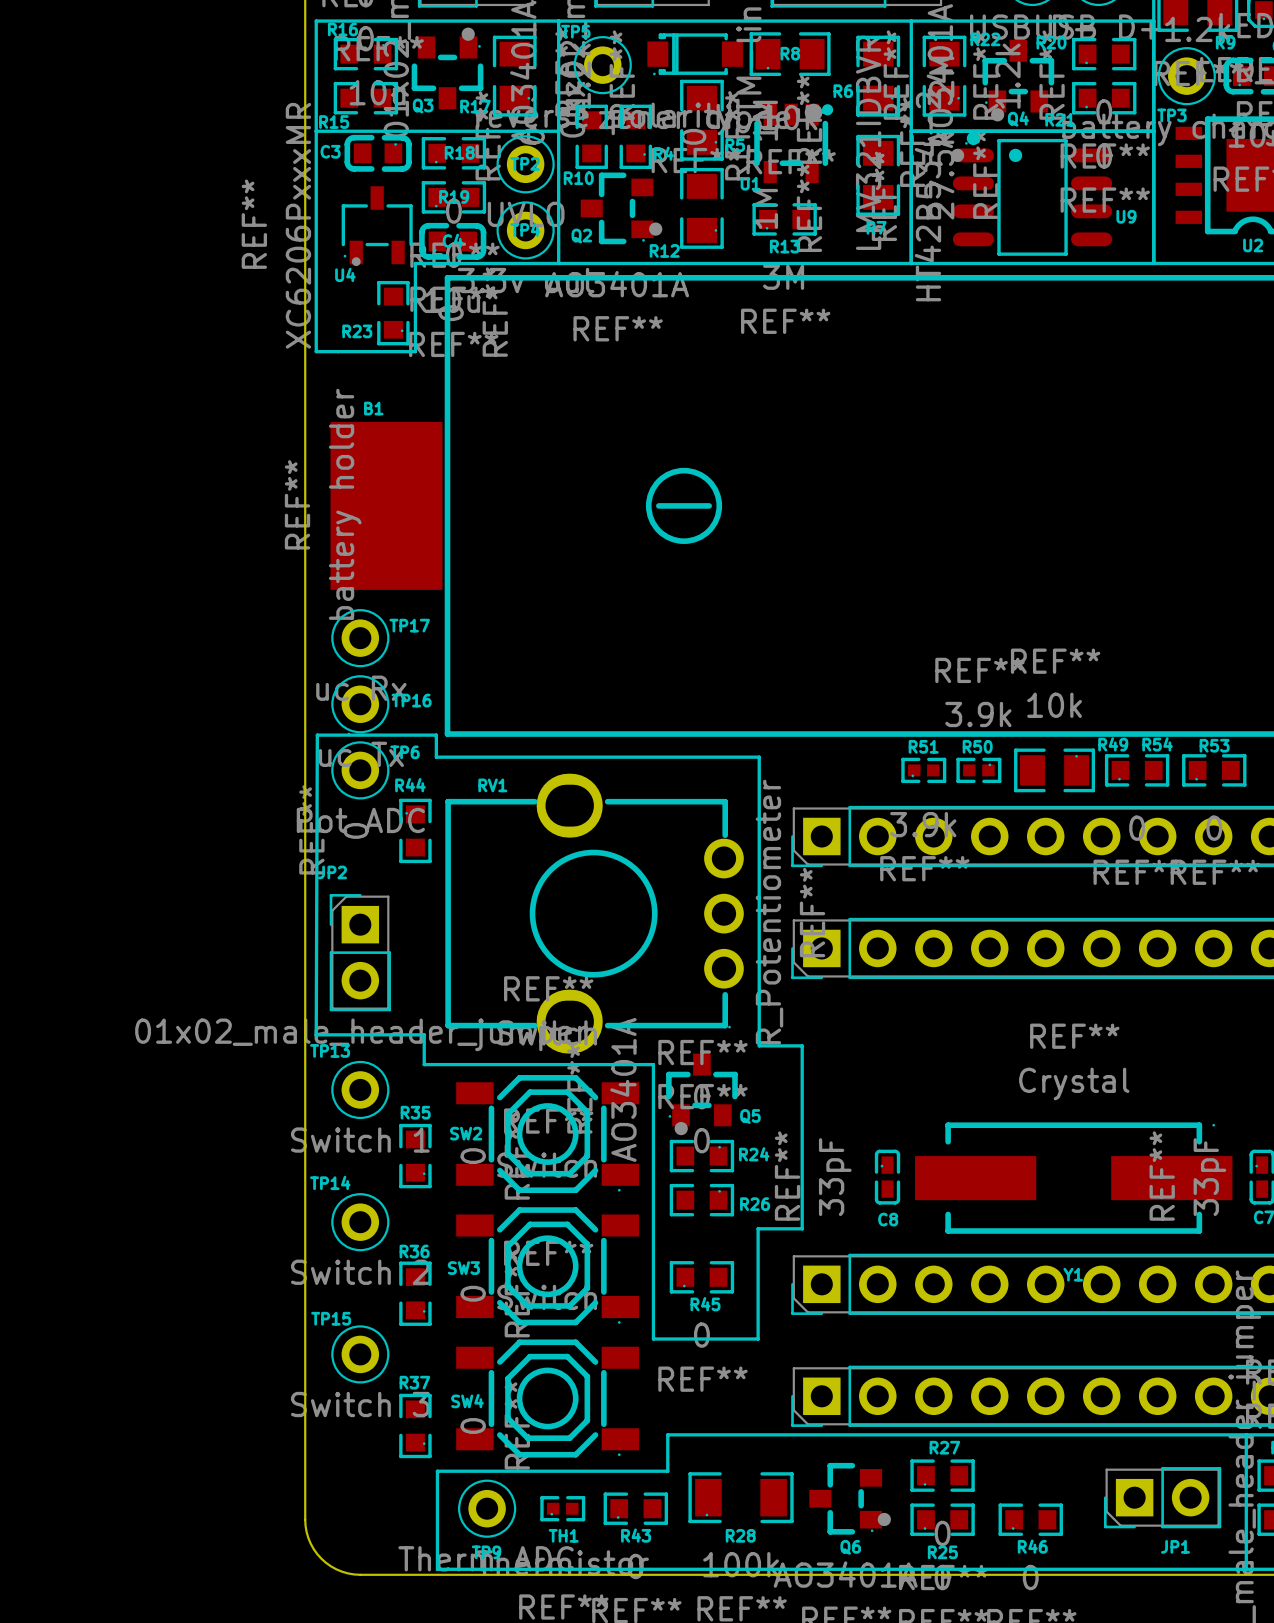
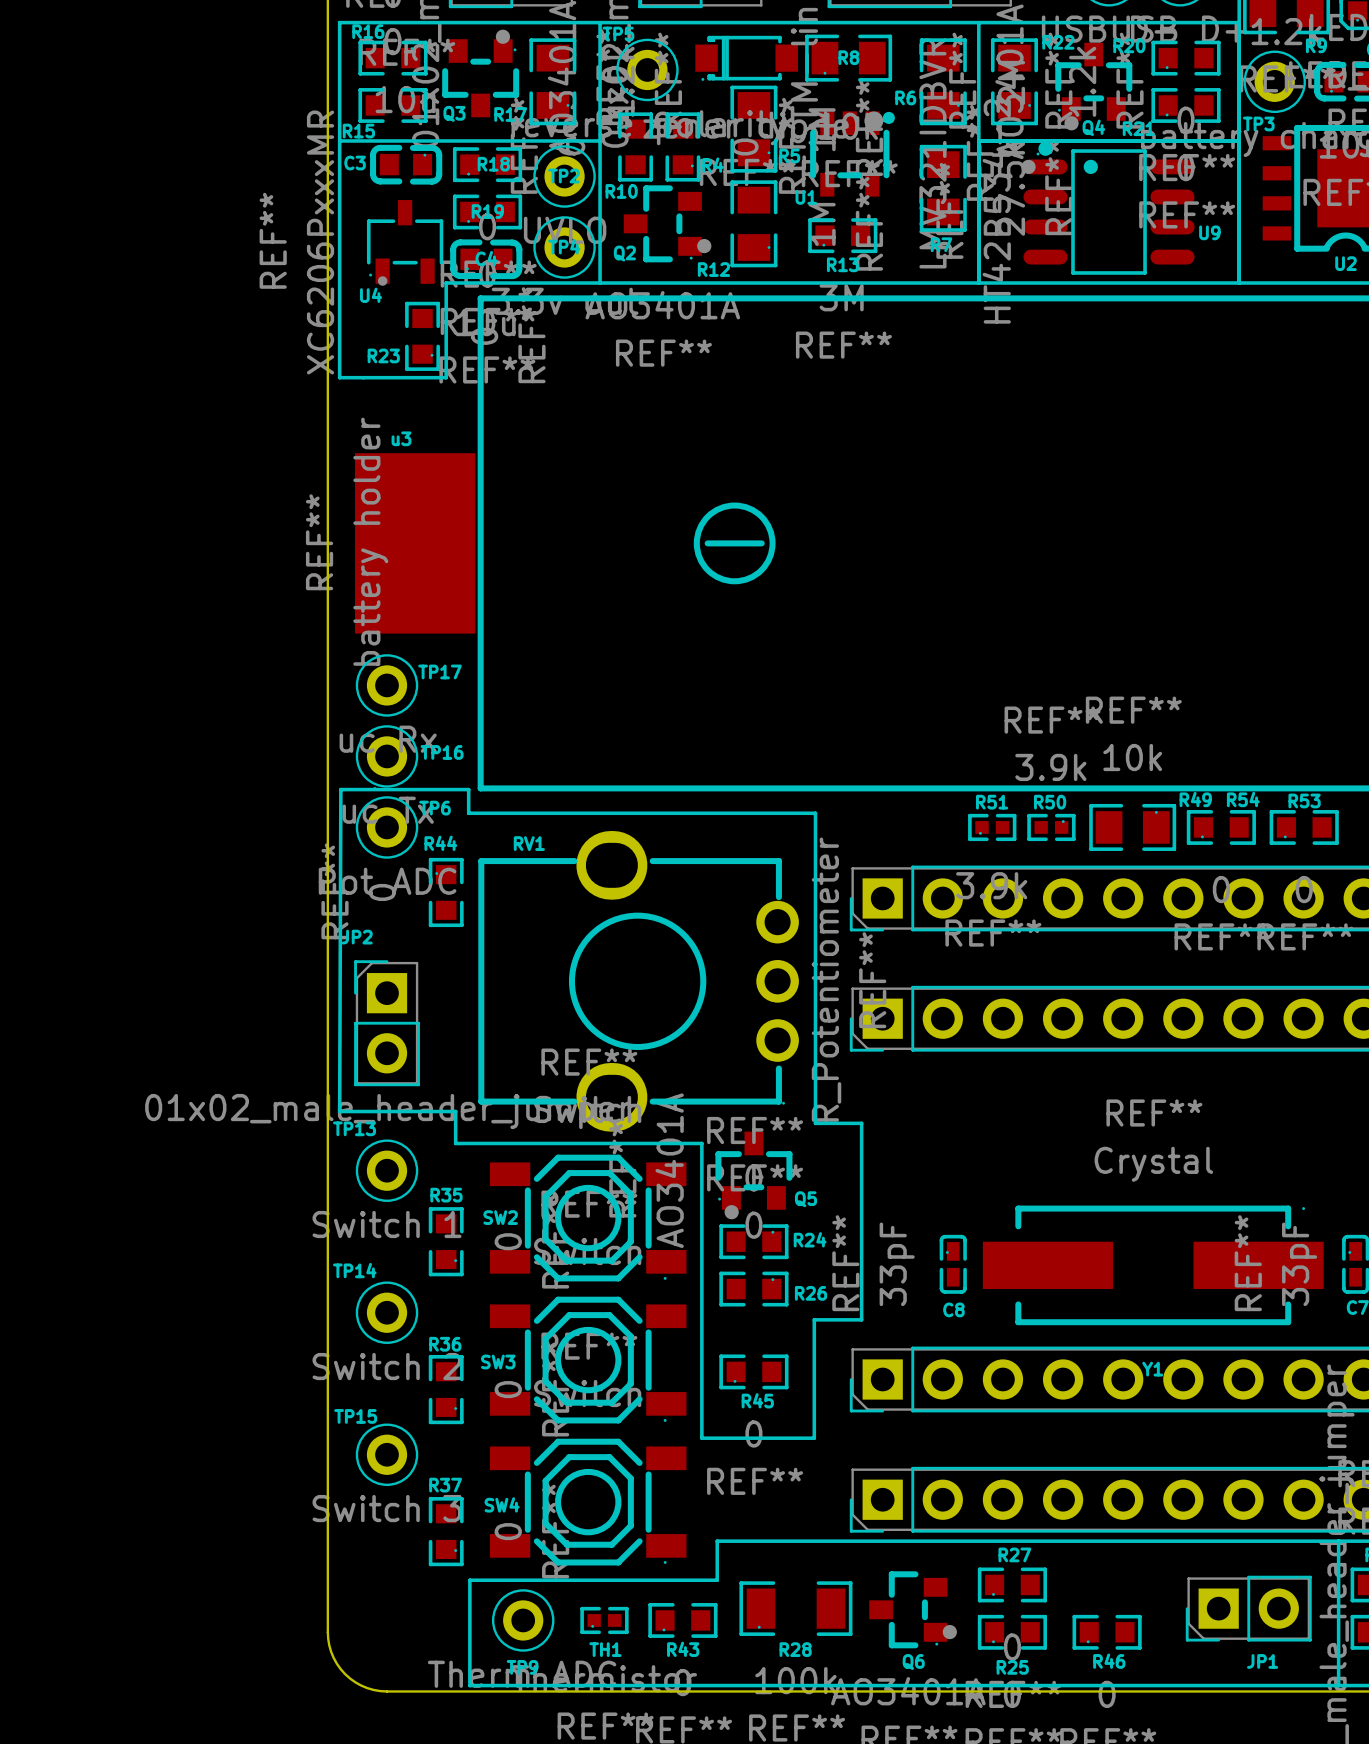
B1 name: B1 (373, 408) -> u3 (401, 438)

